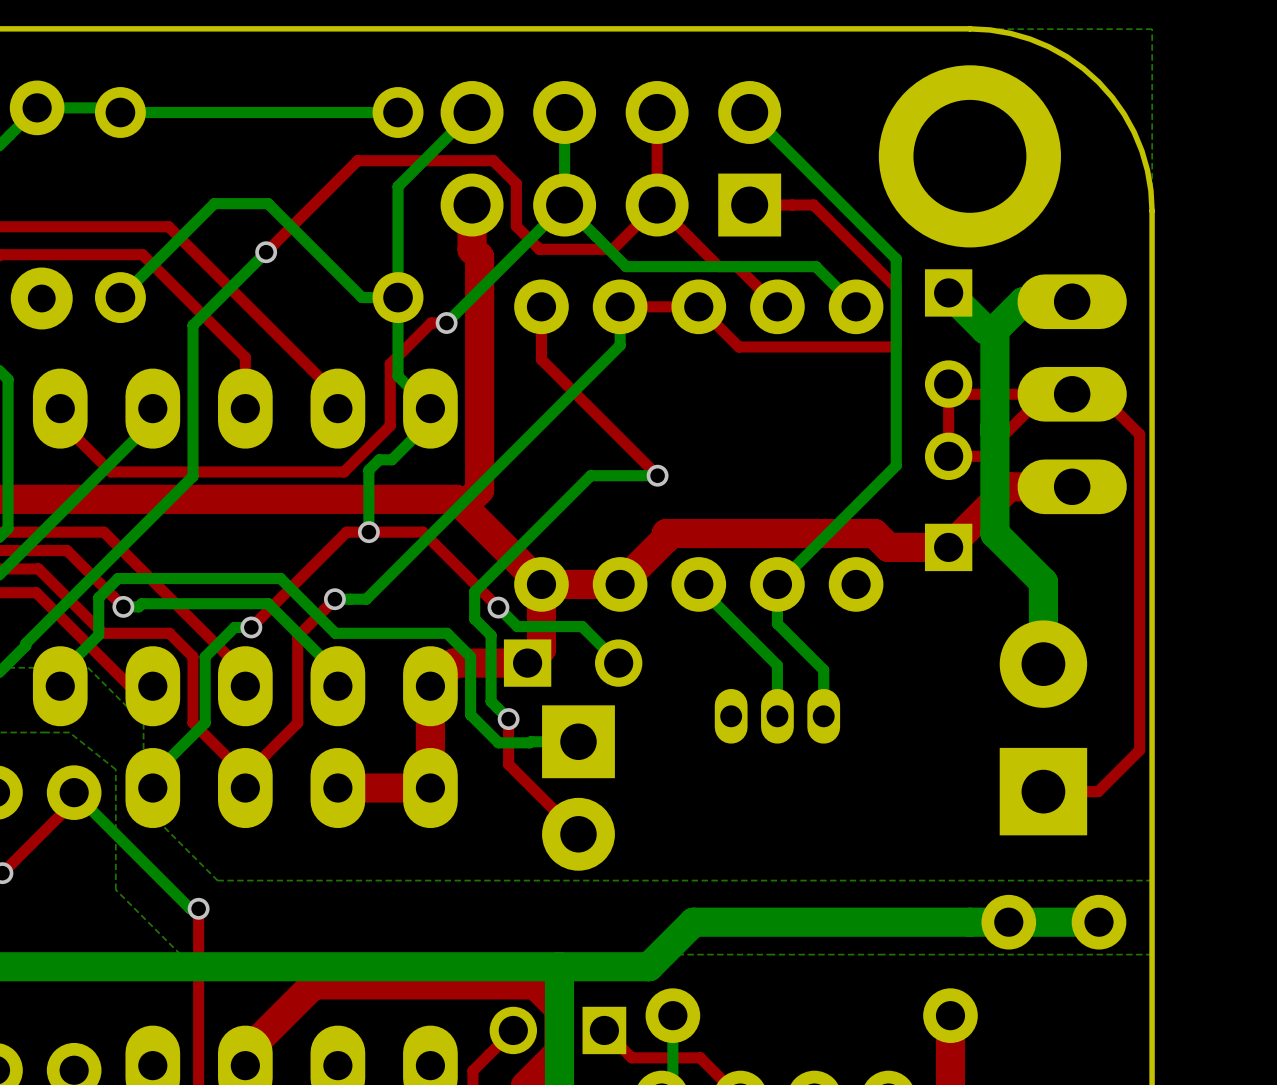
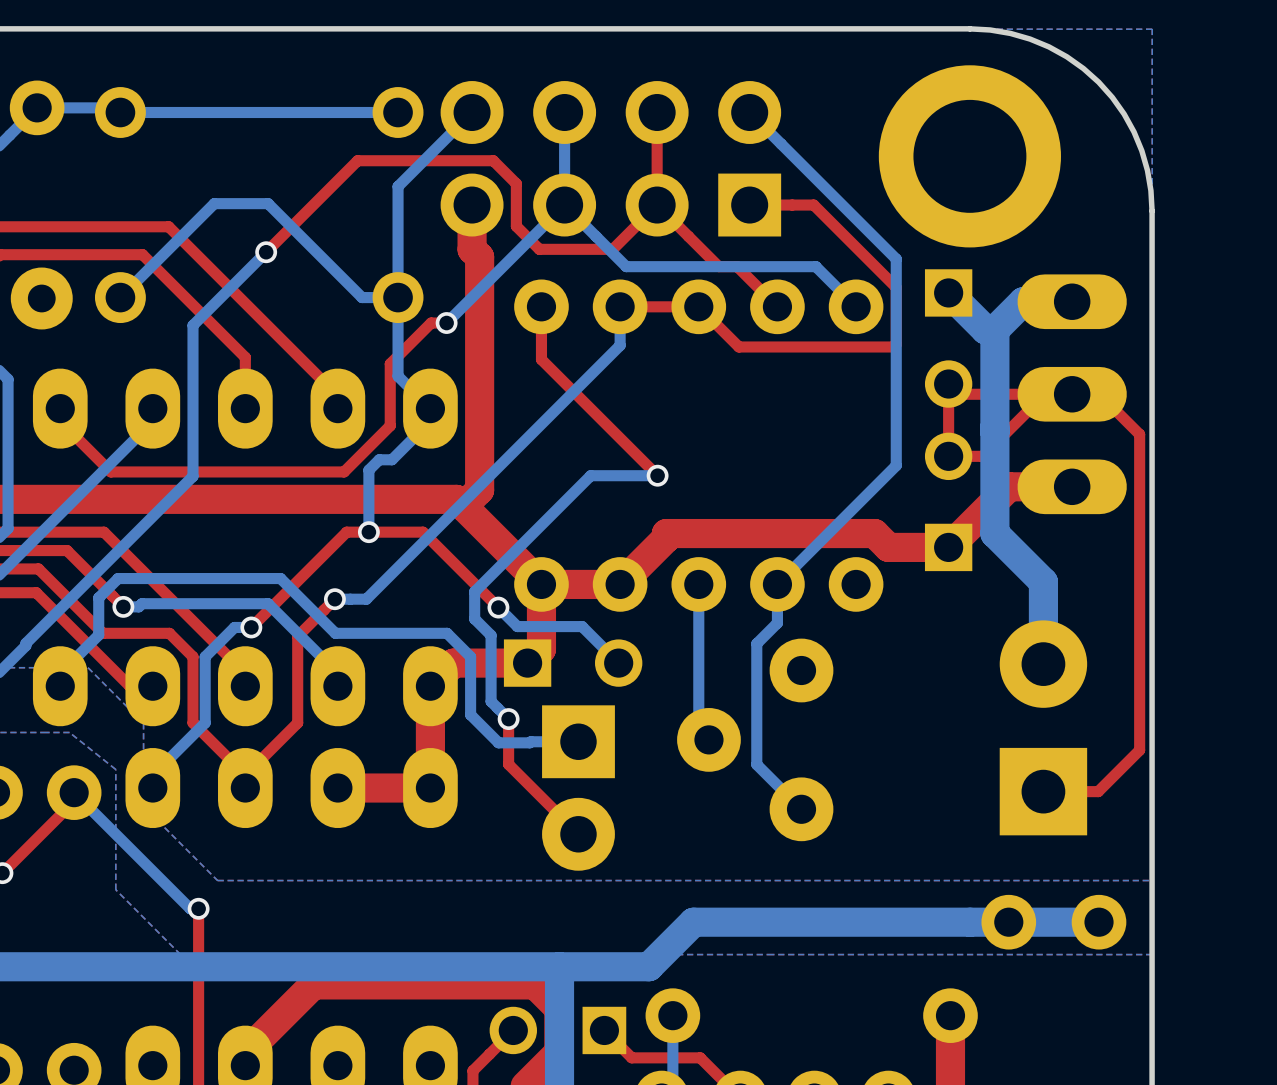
bottom track: (698, 586) (777, 665) (777, 716) -> (698, 586) (698, 729) (708, 739)
bottom track: (777, 623) (823, 670) (823, 716) -> (777, 623) (756, 643) (756, 764) (801, 809)
part footprint: [714, 688, 841, 744] -> [677, 638, 834, 842]

